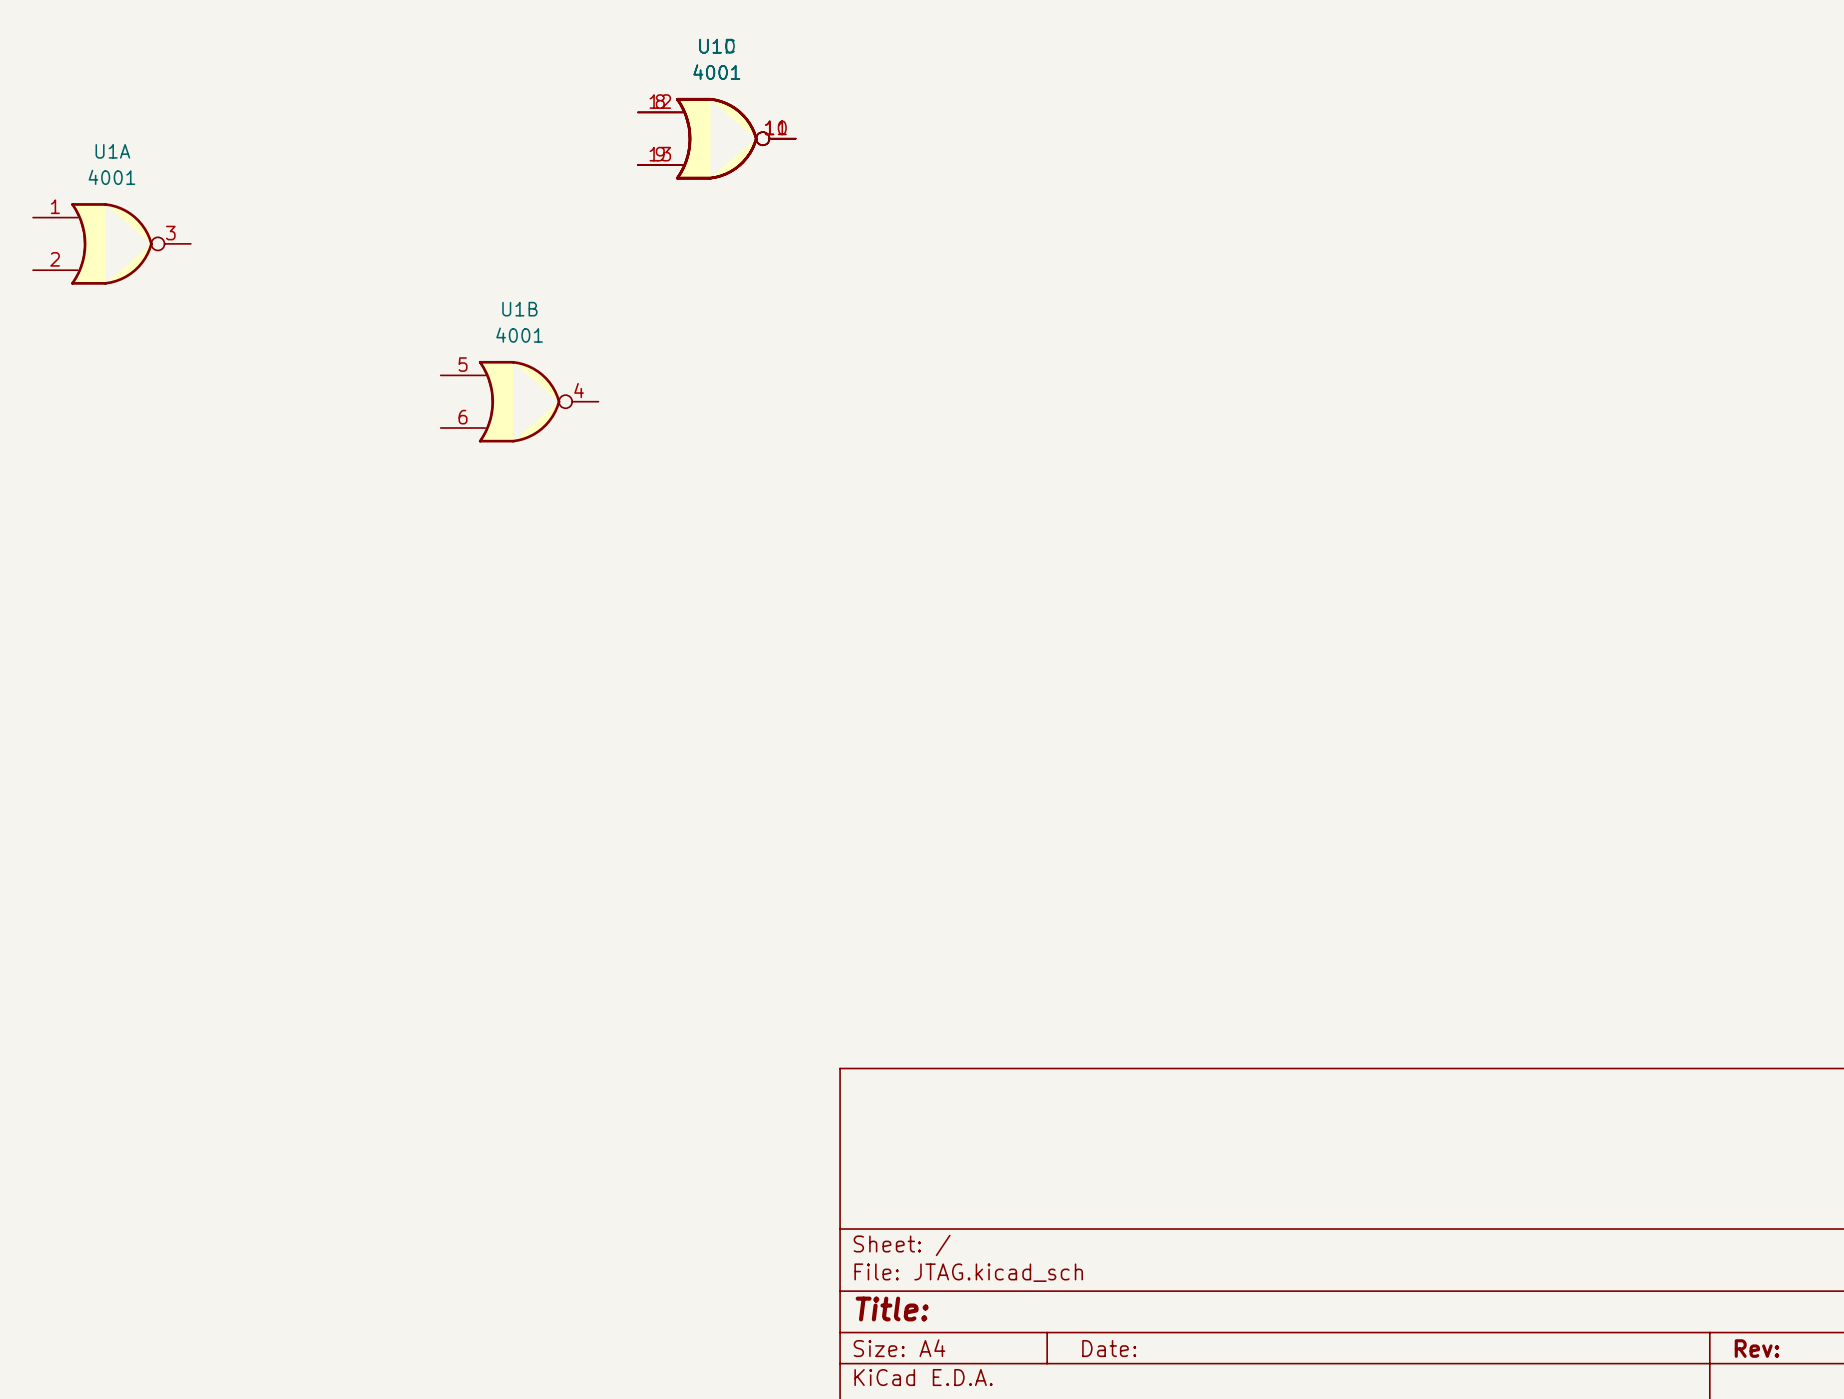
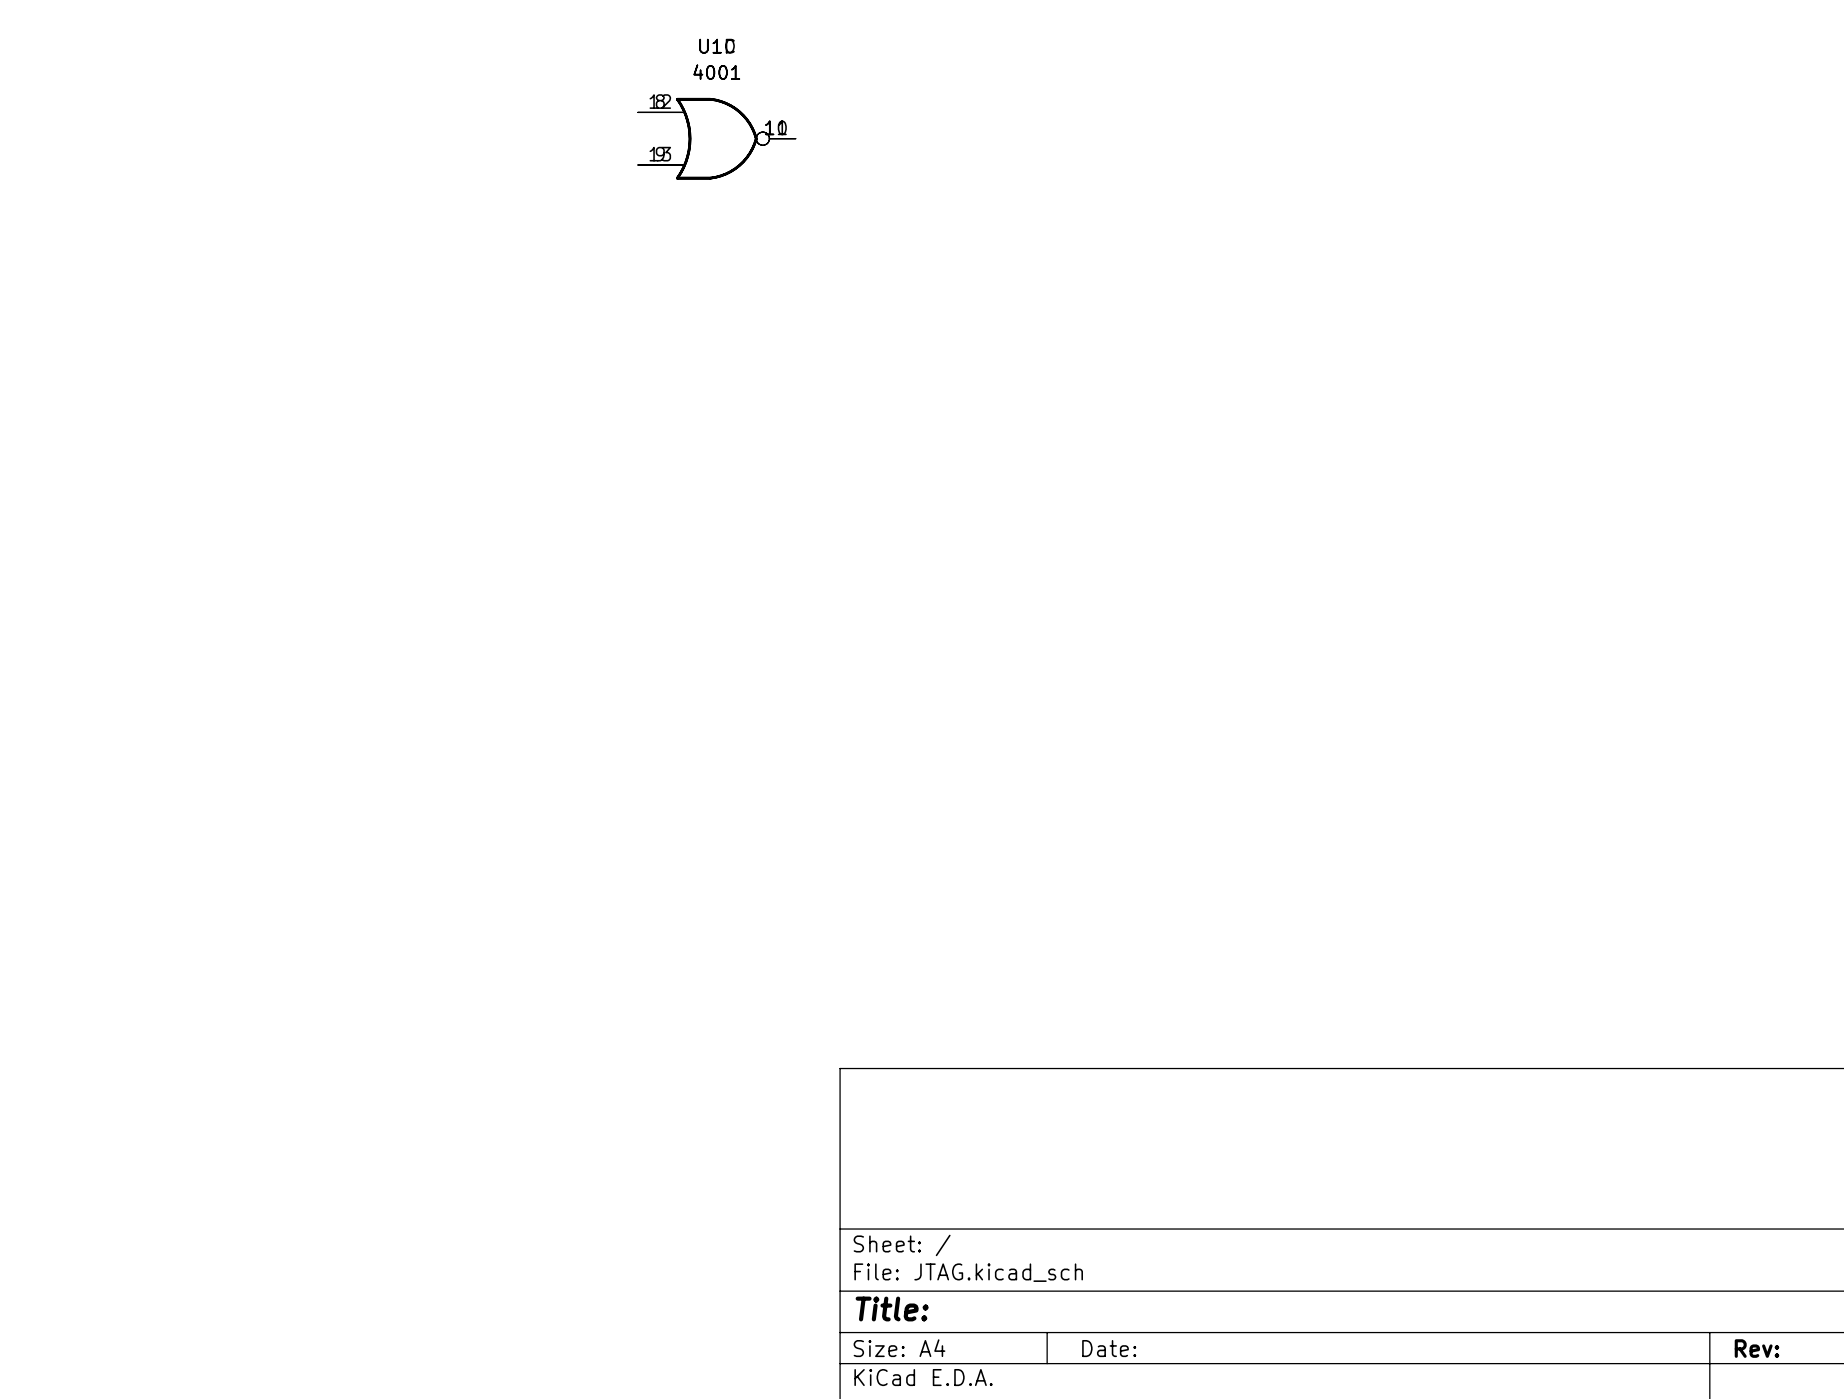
U1A: 4001 (111, 243) -> none
U1B: 4001 (519, 401) -> none

